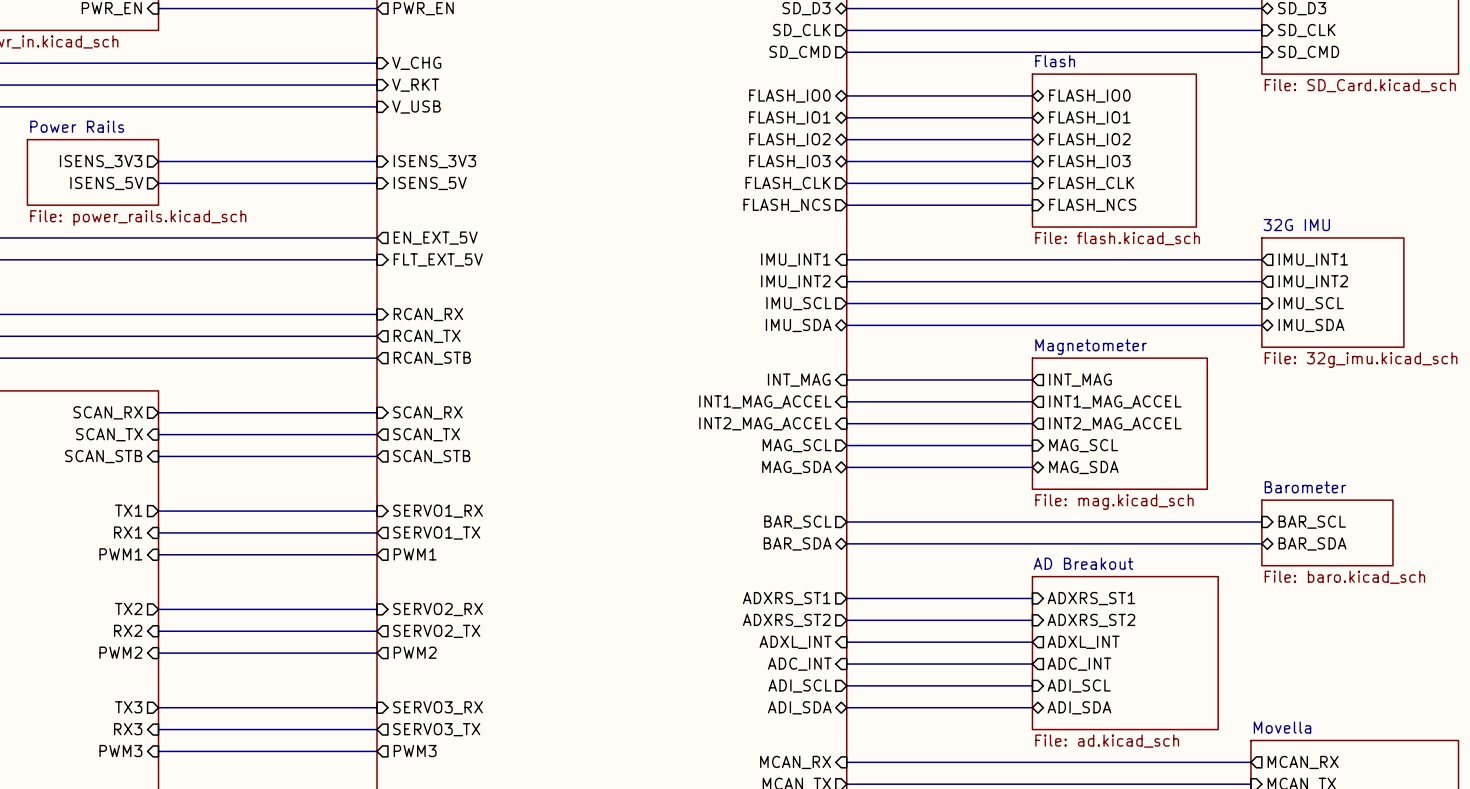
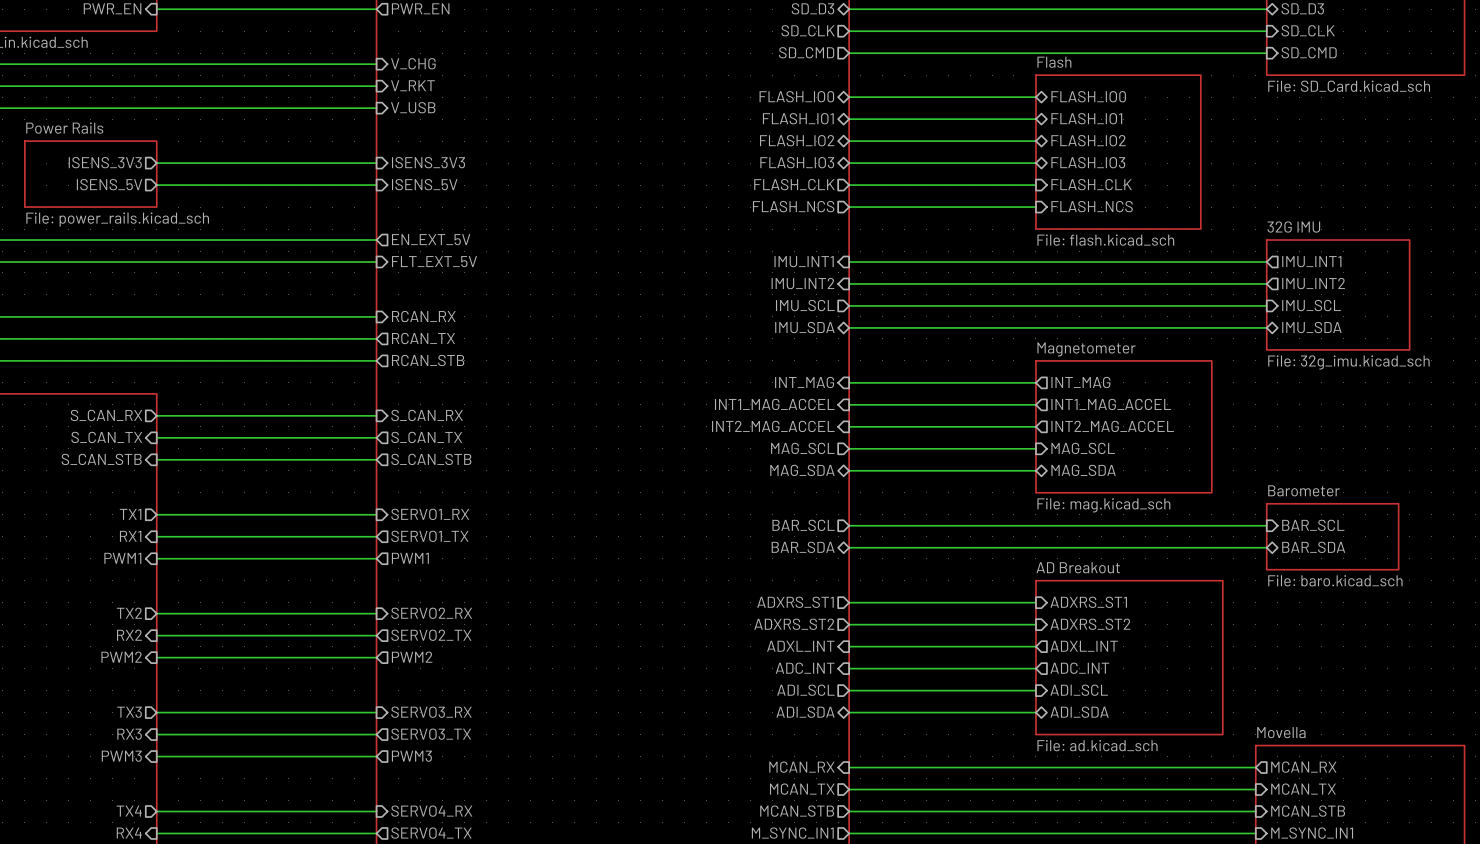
sheet pin: SCAN_RX (108, 412) -> S_CAN_RX (106, 415)
sheet pin: SCAN_RX (427, 412) -> S_CAN_RX (427, 415)
sheet pin: SCAN_TX (109, 434) -> S_CAN_TX (106, 437)
sheet pin: SCAN_TX (426, 434) -> S_CAN_TX (426, 437)
sheet pin: SCAN_STB (103, 456) -> S_CAN_STB (101, 459)
sheet pin: SCAN_STB (431, 456) -> S_CAN_STB (431, 459)

